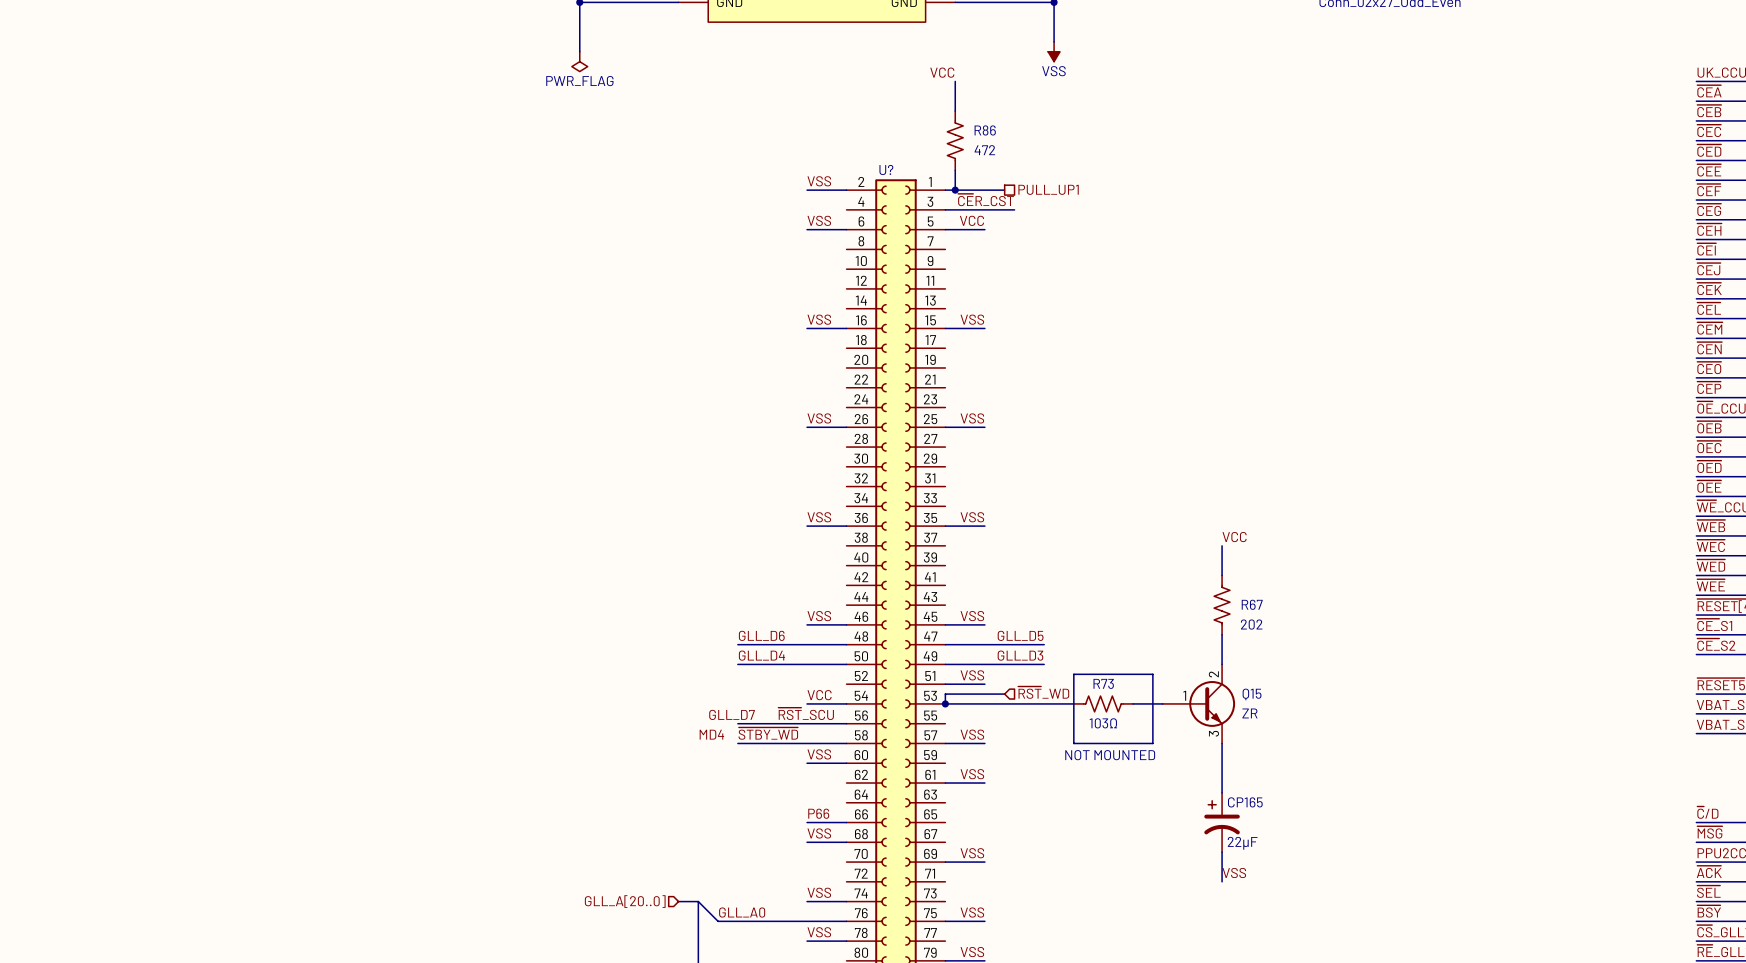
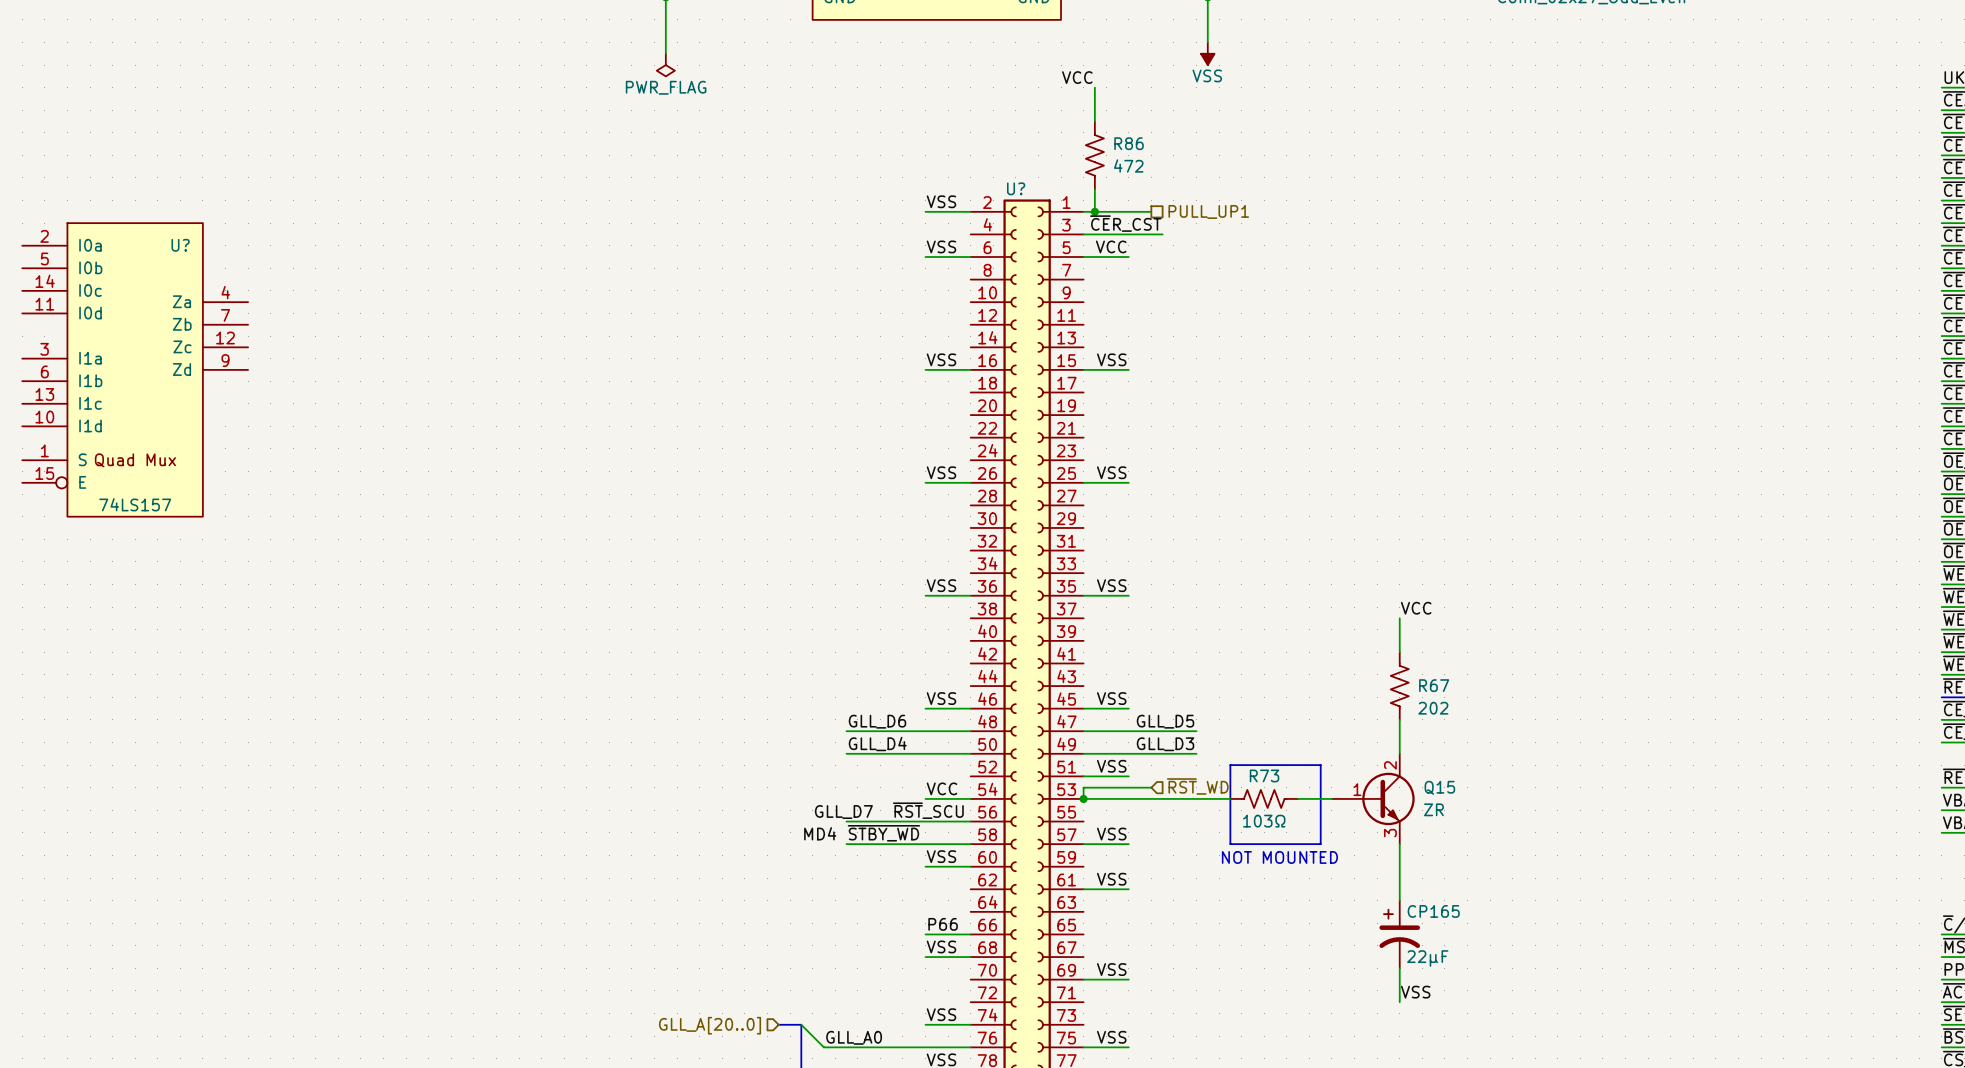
U?: none -> 74LS157 (135, 369)

